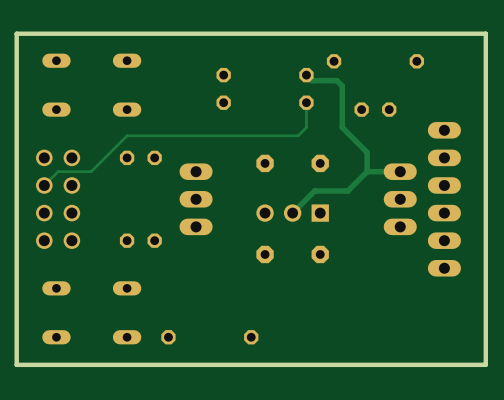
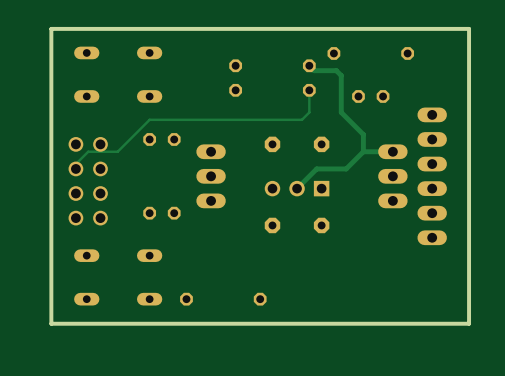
part: (44, 199) -> none
part: (71, 199) -> none
part: none -> (88, 181)

